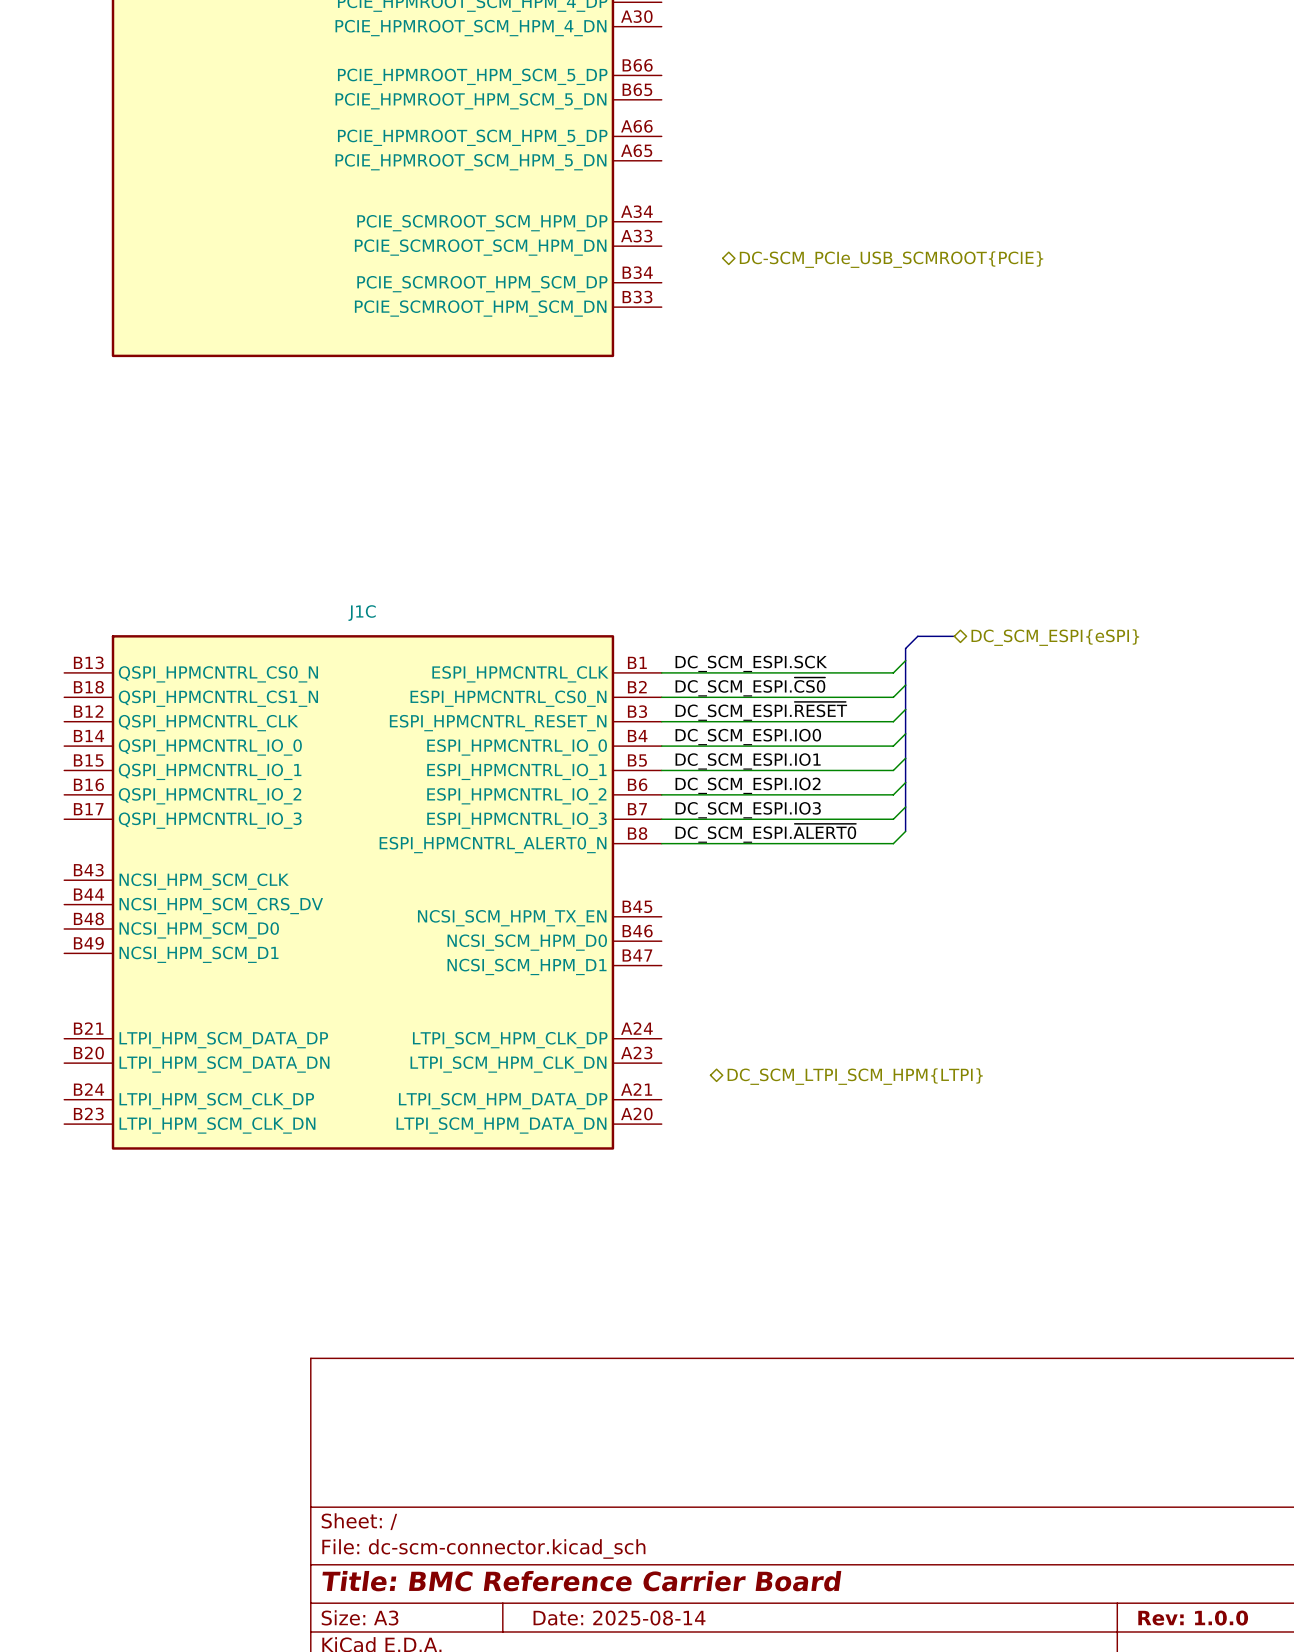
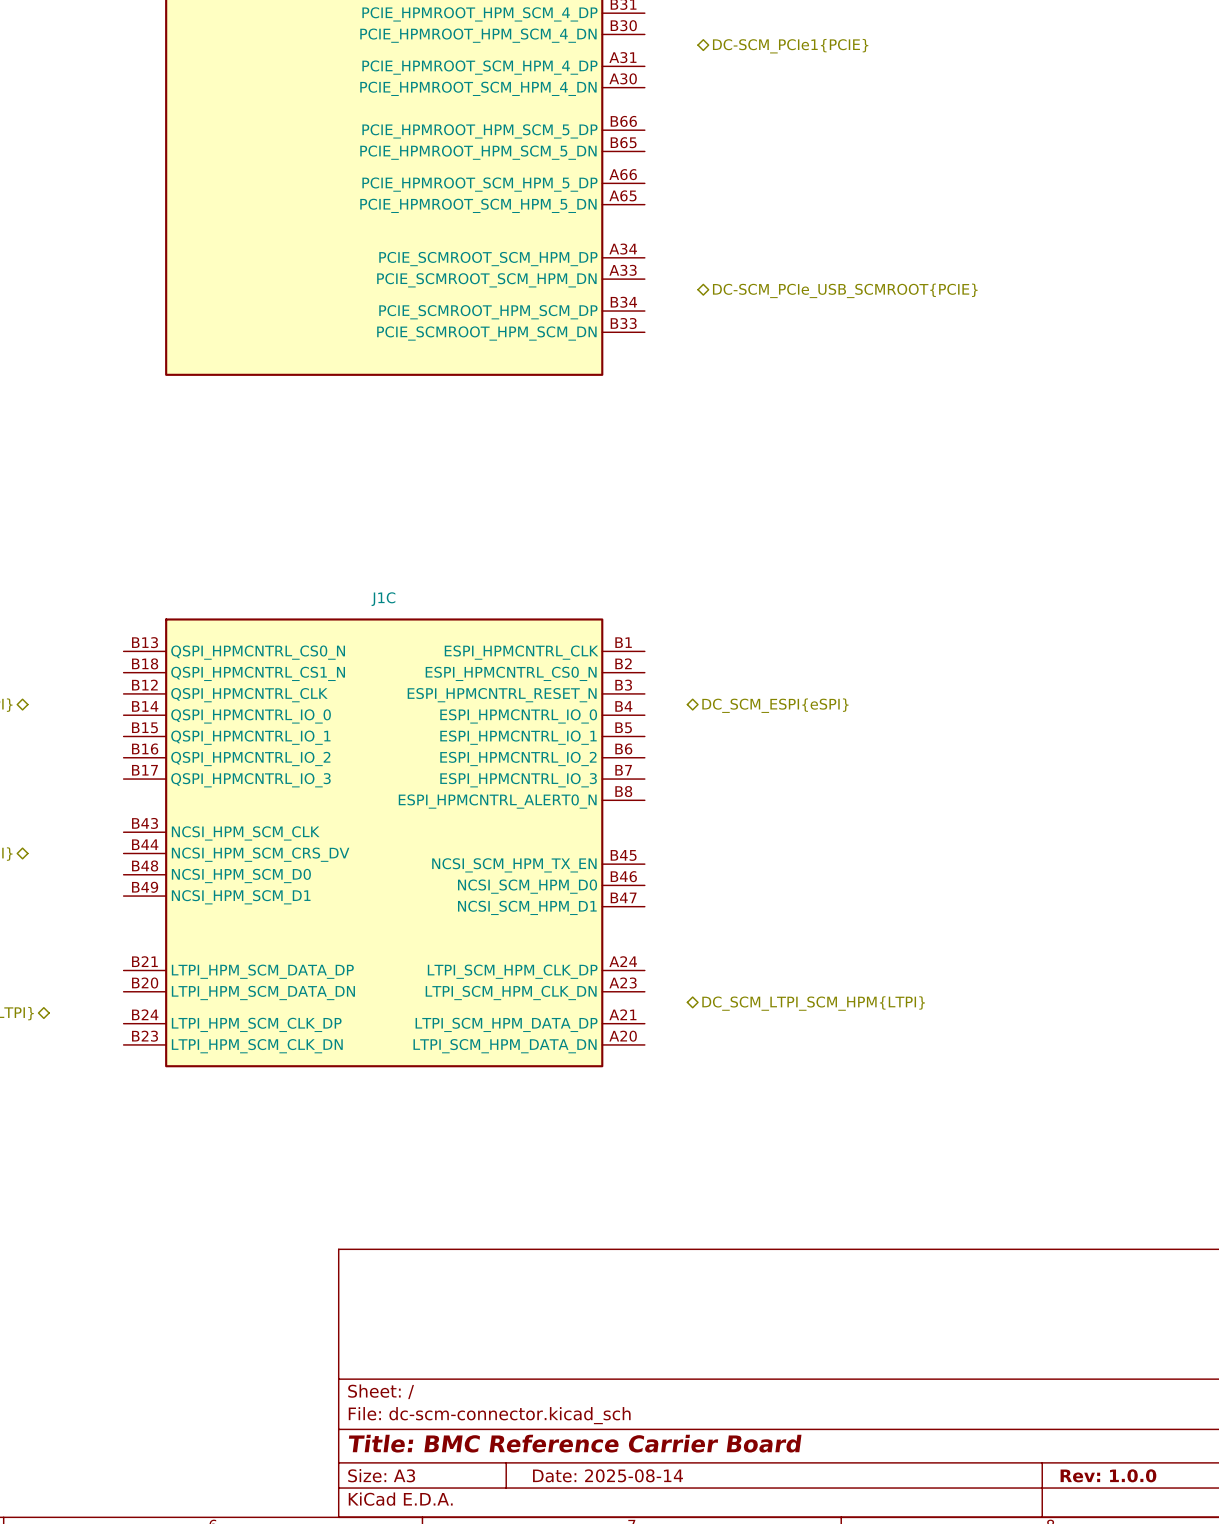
bus: (954, 636) (917, 636) (905, 648) (905, 831) -> none
hierarchical label: DC_SCM_ESPI{eSPI} (1055, 637) -> none
wire: (905, 660) (893, 672) (661, 672) -> none
label: DC_SCM_ESPI.SCK (751, 663) -> none
wire: (905, 685) (893, 697) (661, 697) -> none
label: DC_SCM_ESPI.~{CS0} (750, 687) -> none
wire: (905, 709) (893, 721) (661, 721) -> none
label: DC_SCM_ESPI.~{RESET} (761, 711) -> none
wire: (905, 733) (893, 746) (661, 746) -> none
hierarchical label: none -> DC_SCM_ESPI{eSPI} (775, 705)
label: DC_SCM_ESPI.IO0 (748, 737) -> none
wire: (905, 758) (893, 770) (661, 770) -> none
label: DC_SCM_ESPI.IO1 (748, 761) -> none
wire: (905, 782) (893, 794) (661, 794) -> none
label: DC_SCM_ESPI.IO2 (748, 785) -> none
wire: (905, 807) (893, 819) (661, 819) -> none
label: DC_SCM_ESPI.IO3 (748, 810) -> none
wire: (905, 831) (893, 843) (661, 843) -> none
label: DC_SCM_ESPI.~{ALERT0} (765, 833) -> none

